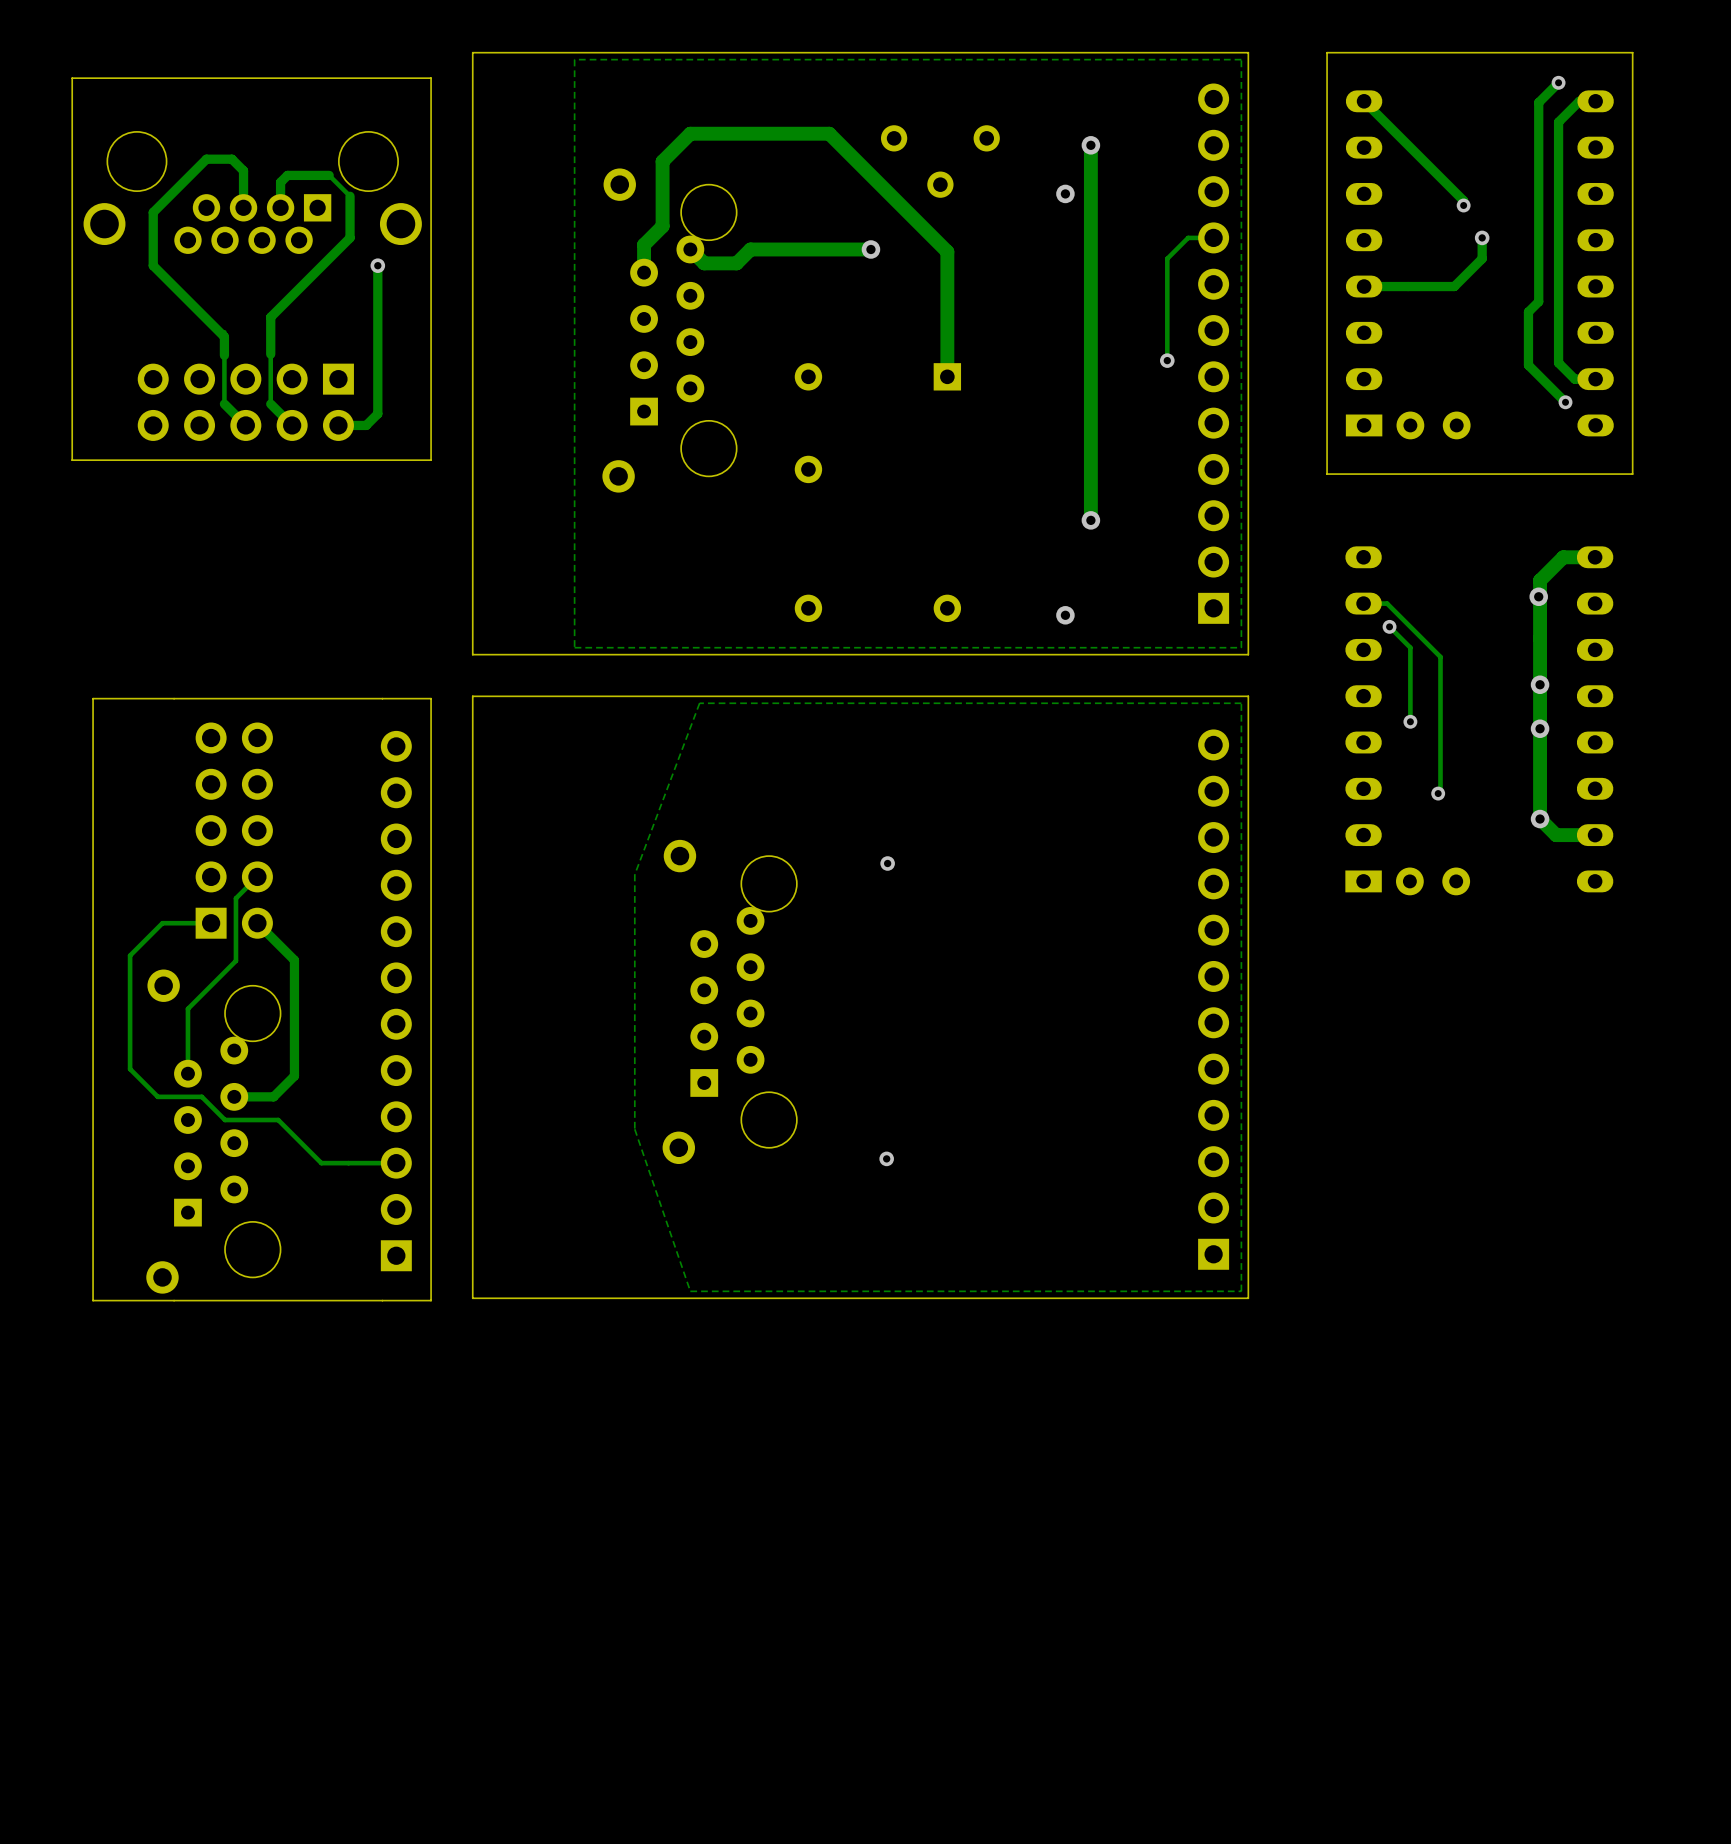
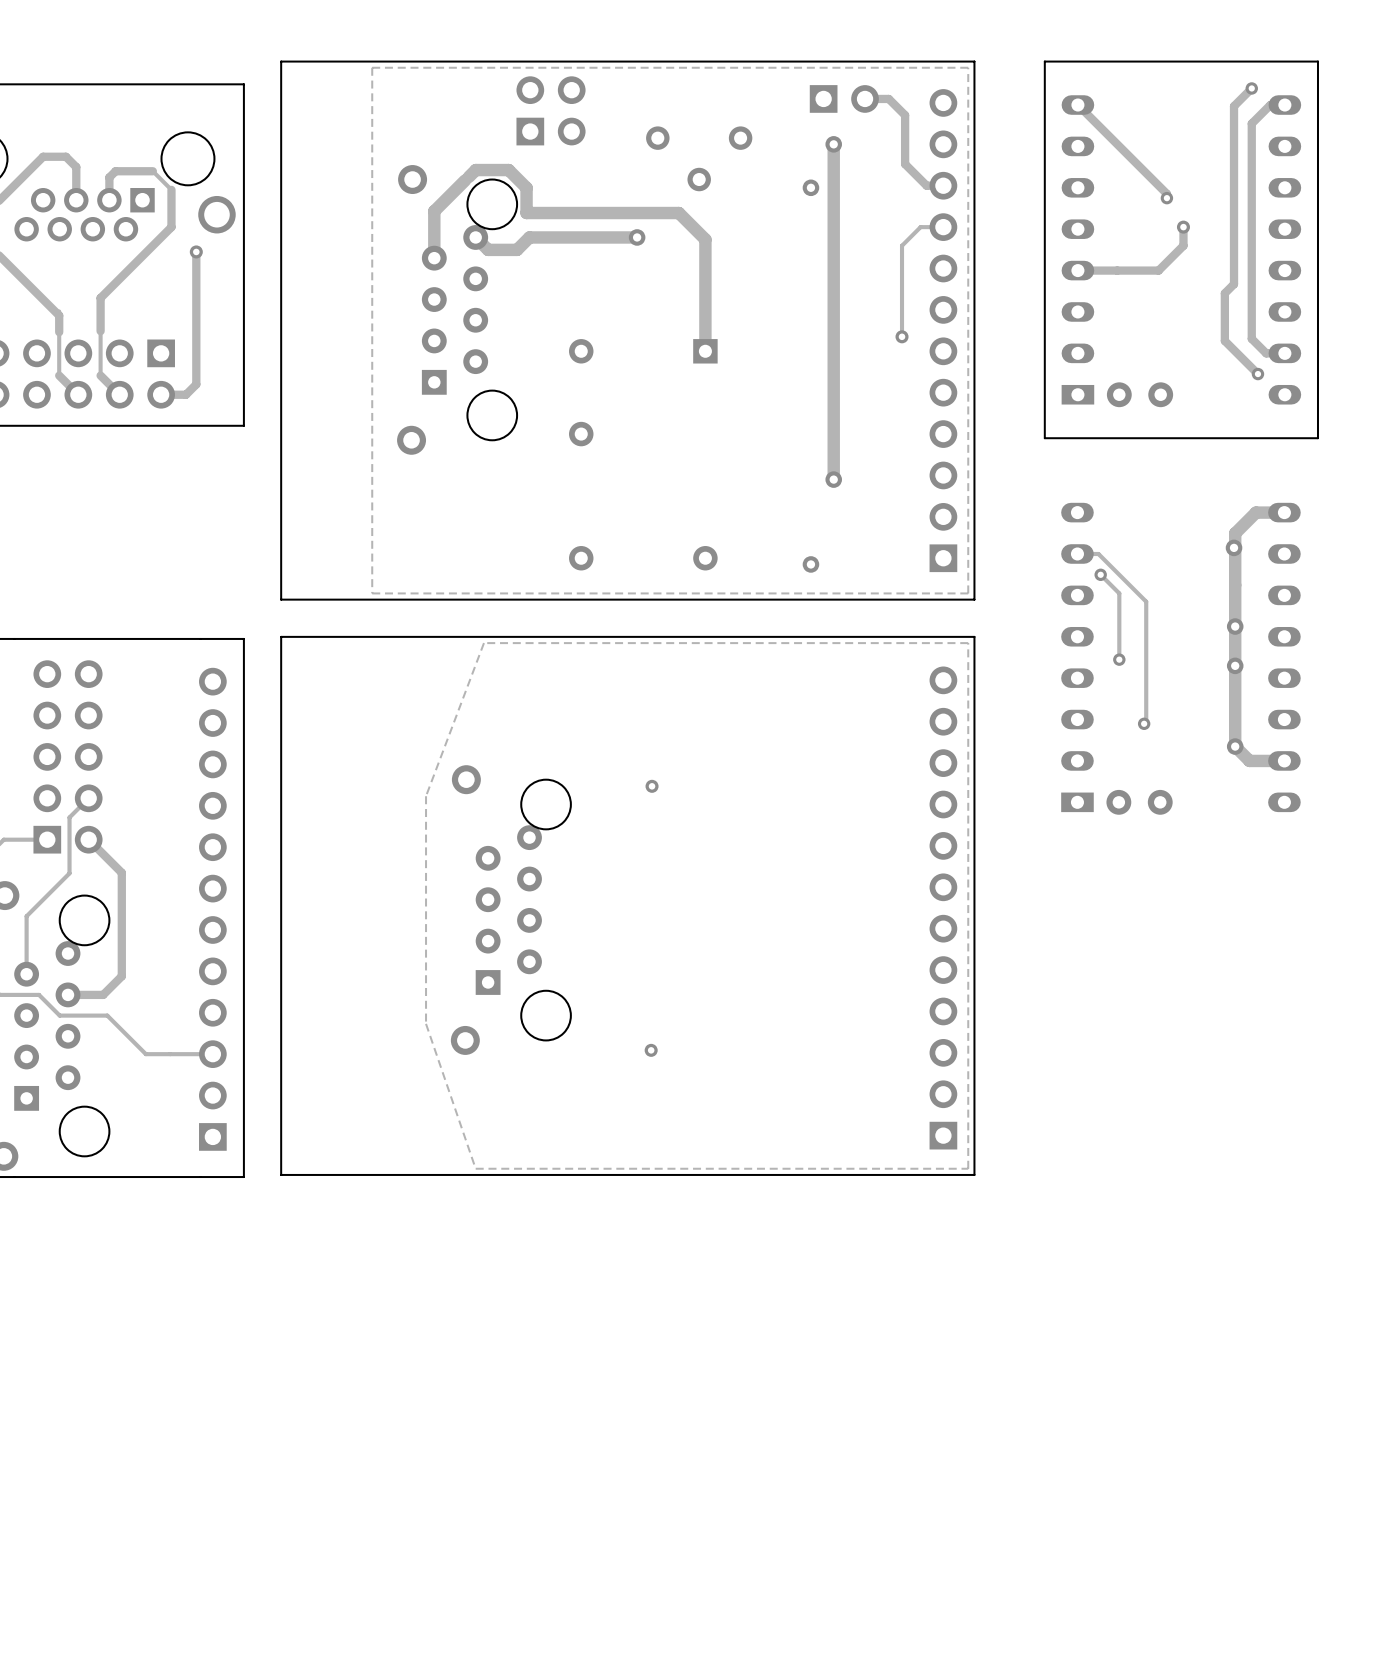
part: none -> (844, 98)
track: none -> (865, 98) (888, 98) (905, 115) (905, 164) (926, 185) (943, 185)
part: none -> (551, 110)
track: none -> (465, 180) (434, 211) (434, 233)
track: (917, 222) (829, 133) (690, 133) (662, 161) (662, 226) (644, 244) -> (678, 213) (526, 213) (526, 187) (508, 170) (475, 170) (468, 176)

